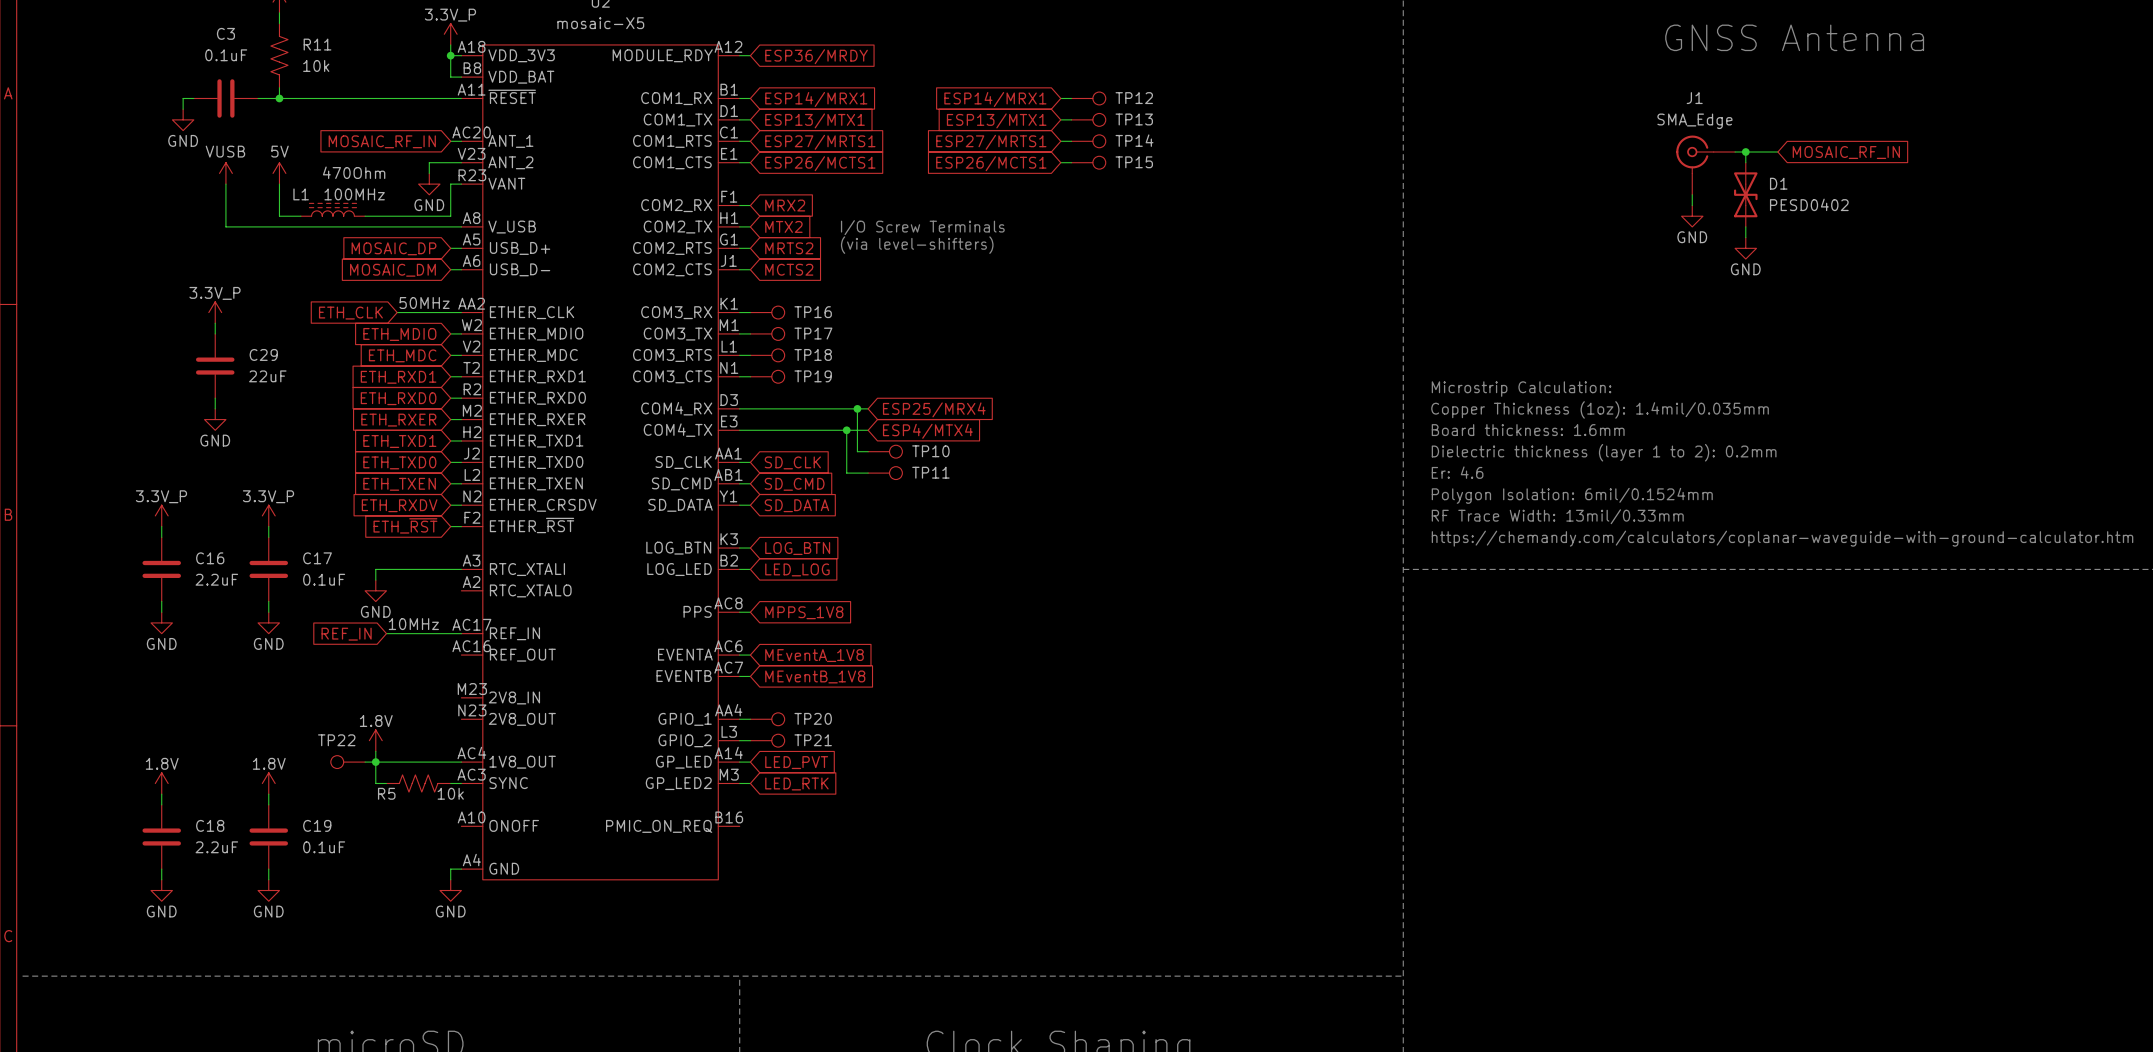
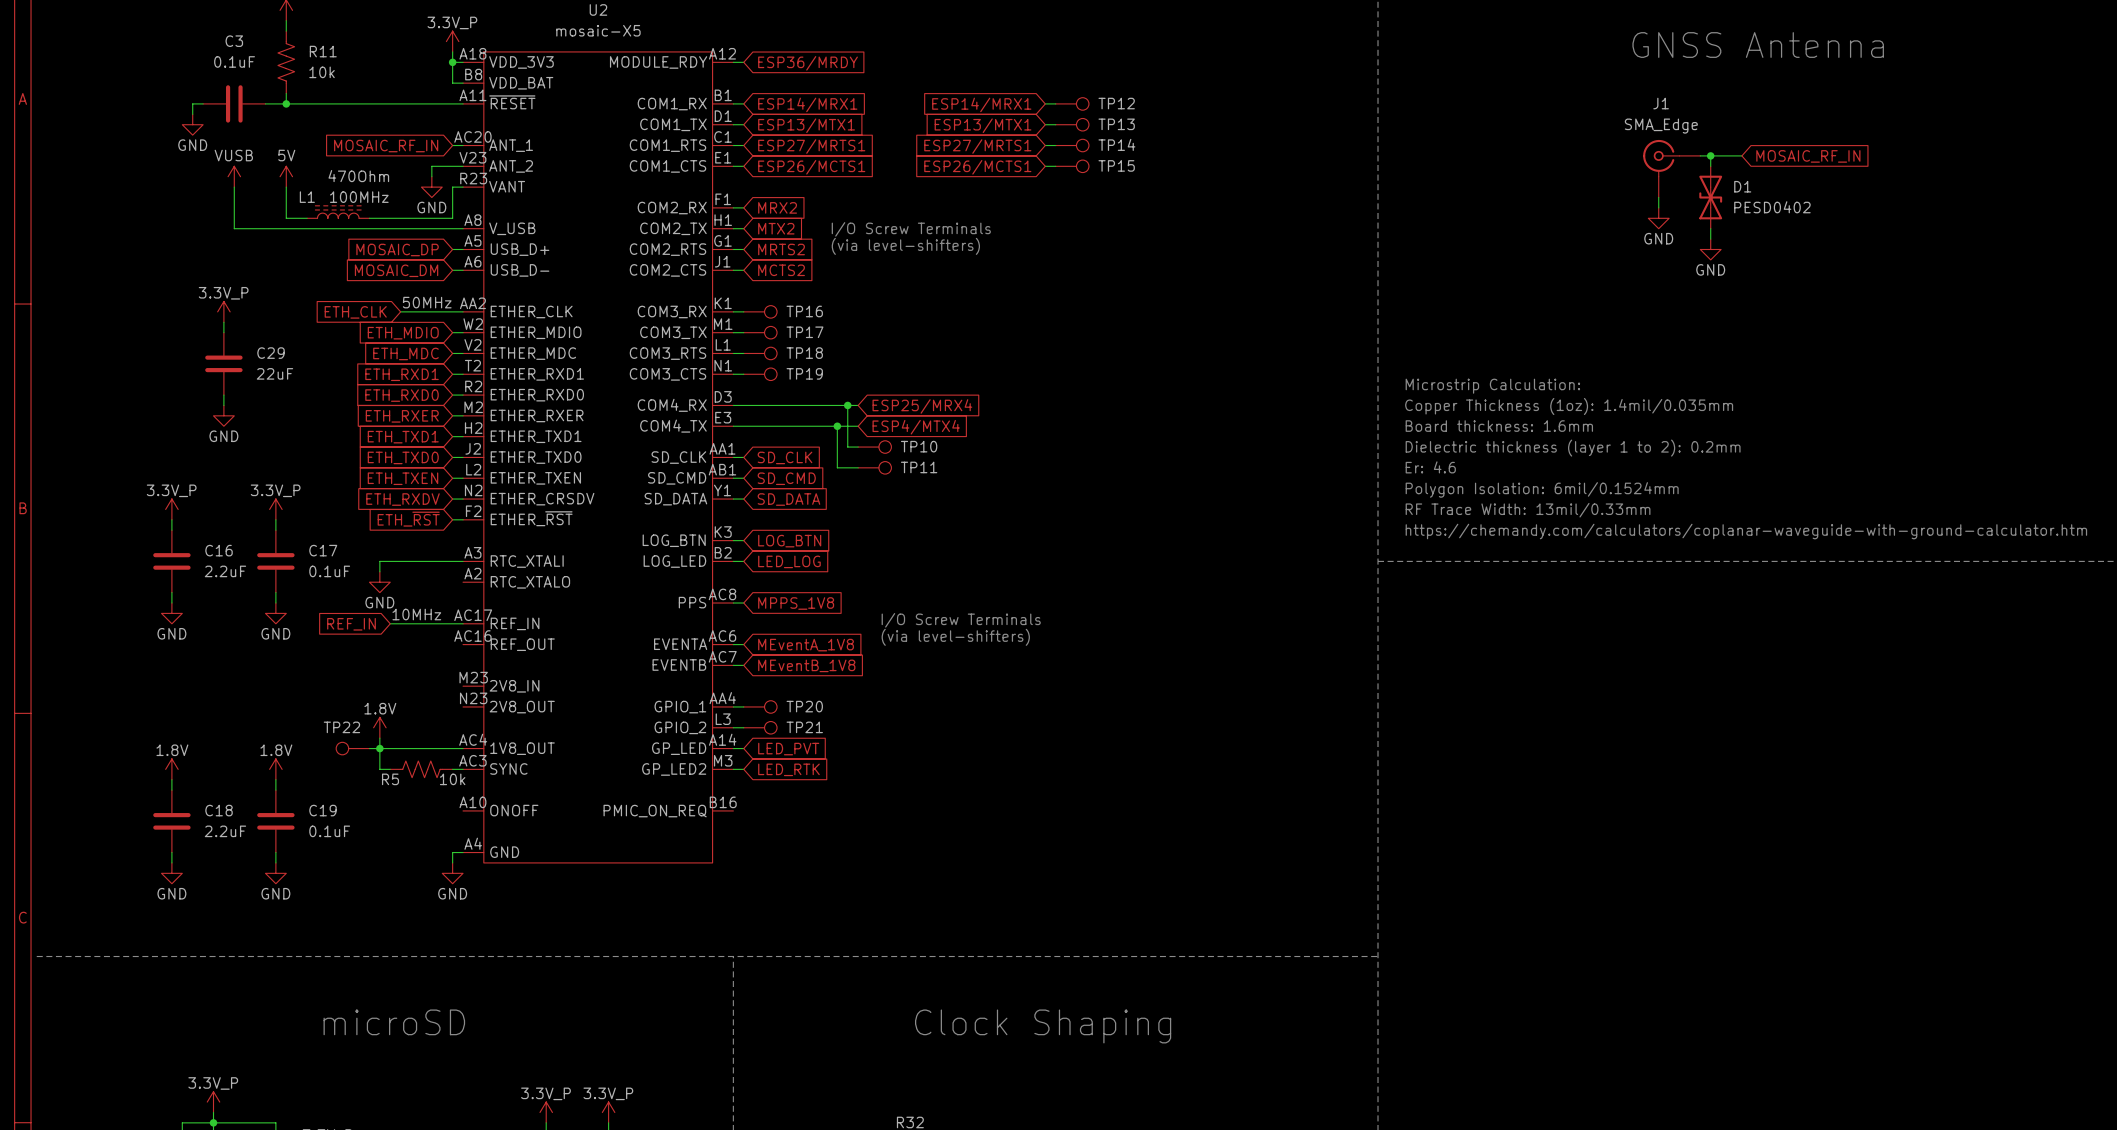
text: none -> I/O Screw Terminals (961, 620)
text: none -> (via level-shifters) (955, 637)

